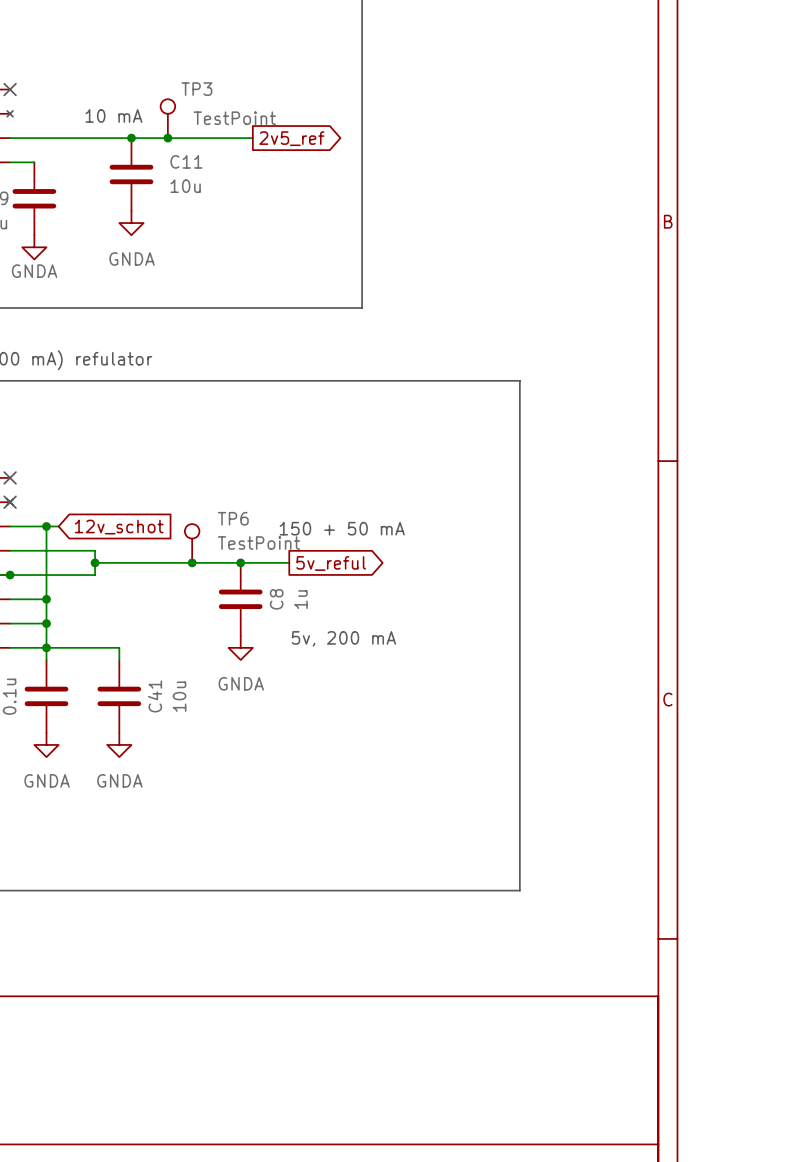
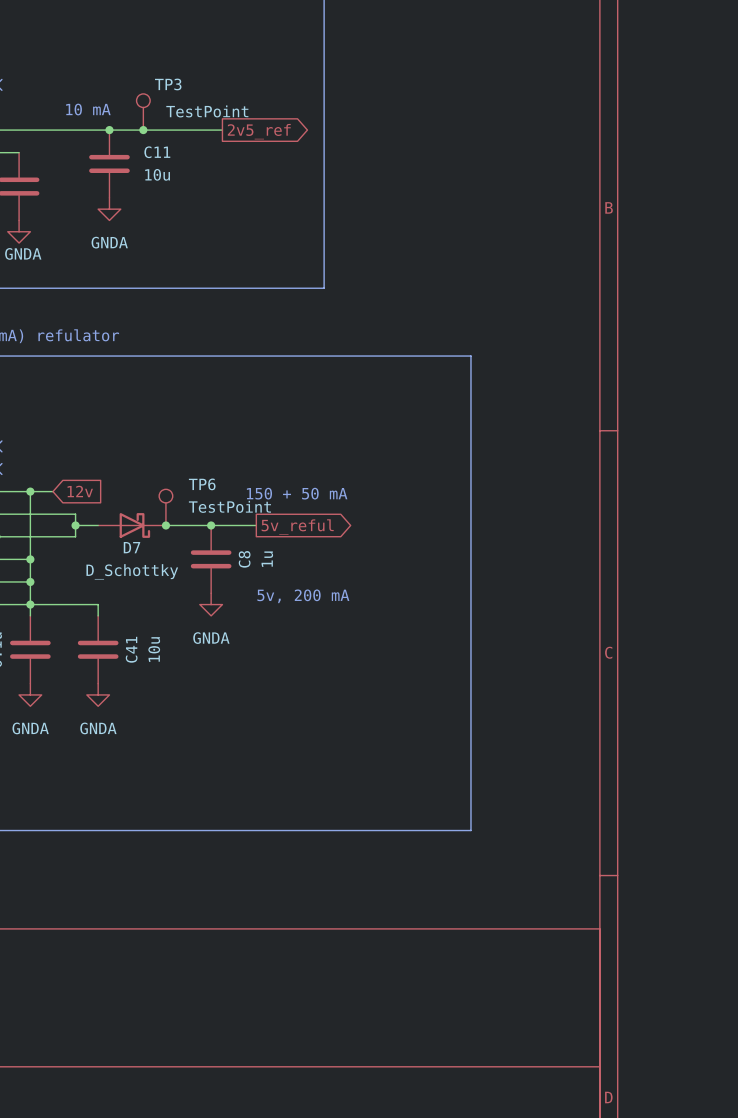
wire: none -> (41, 491) (52, 491)
global label: none -> 12v (80, 491)
global label: 12v_schot (119, 527) -> none
D7: none -> D_Schottky (132, 525)

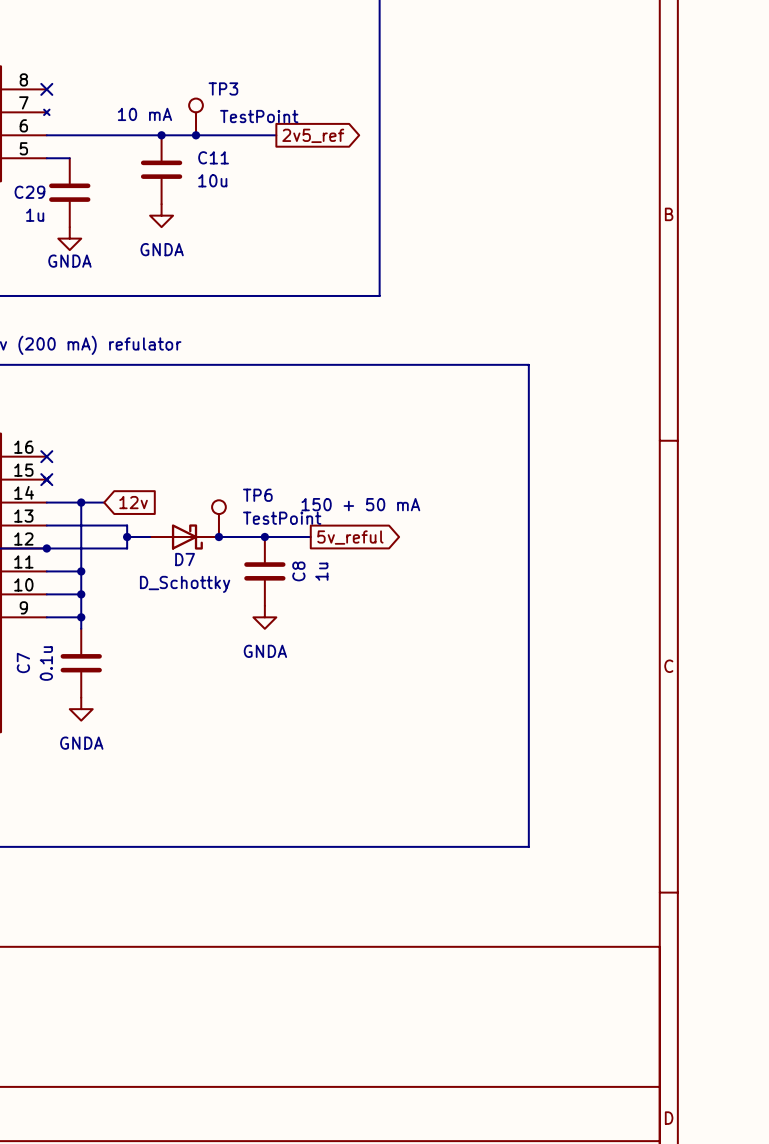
text: 5v, 200 mA (303, 596) -> none
wire: (30, 604) (98, 604) (98, 615) -> none
C41: 10u (98, 649) -> none
power symbol: GNDA (98, 694) -> none

